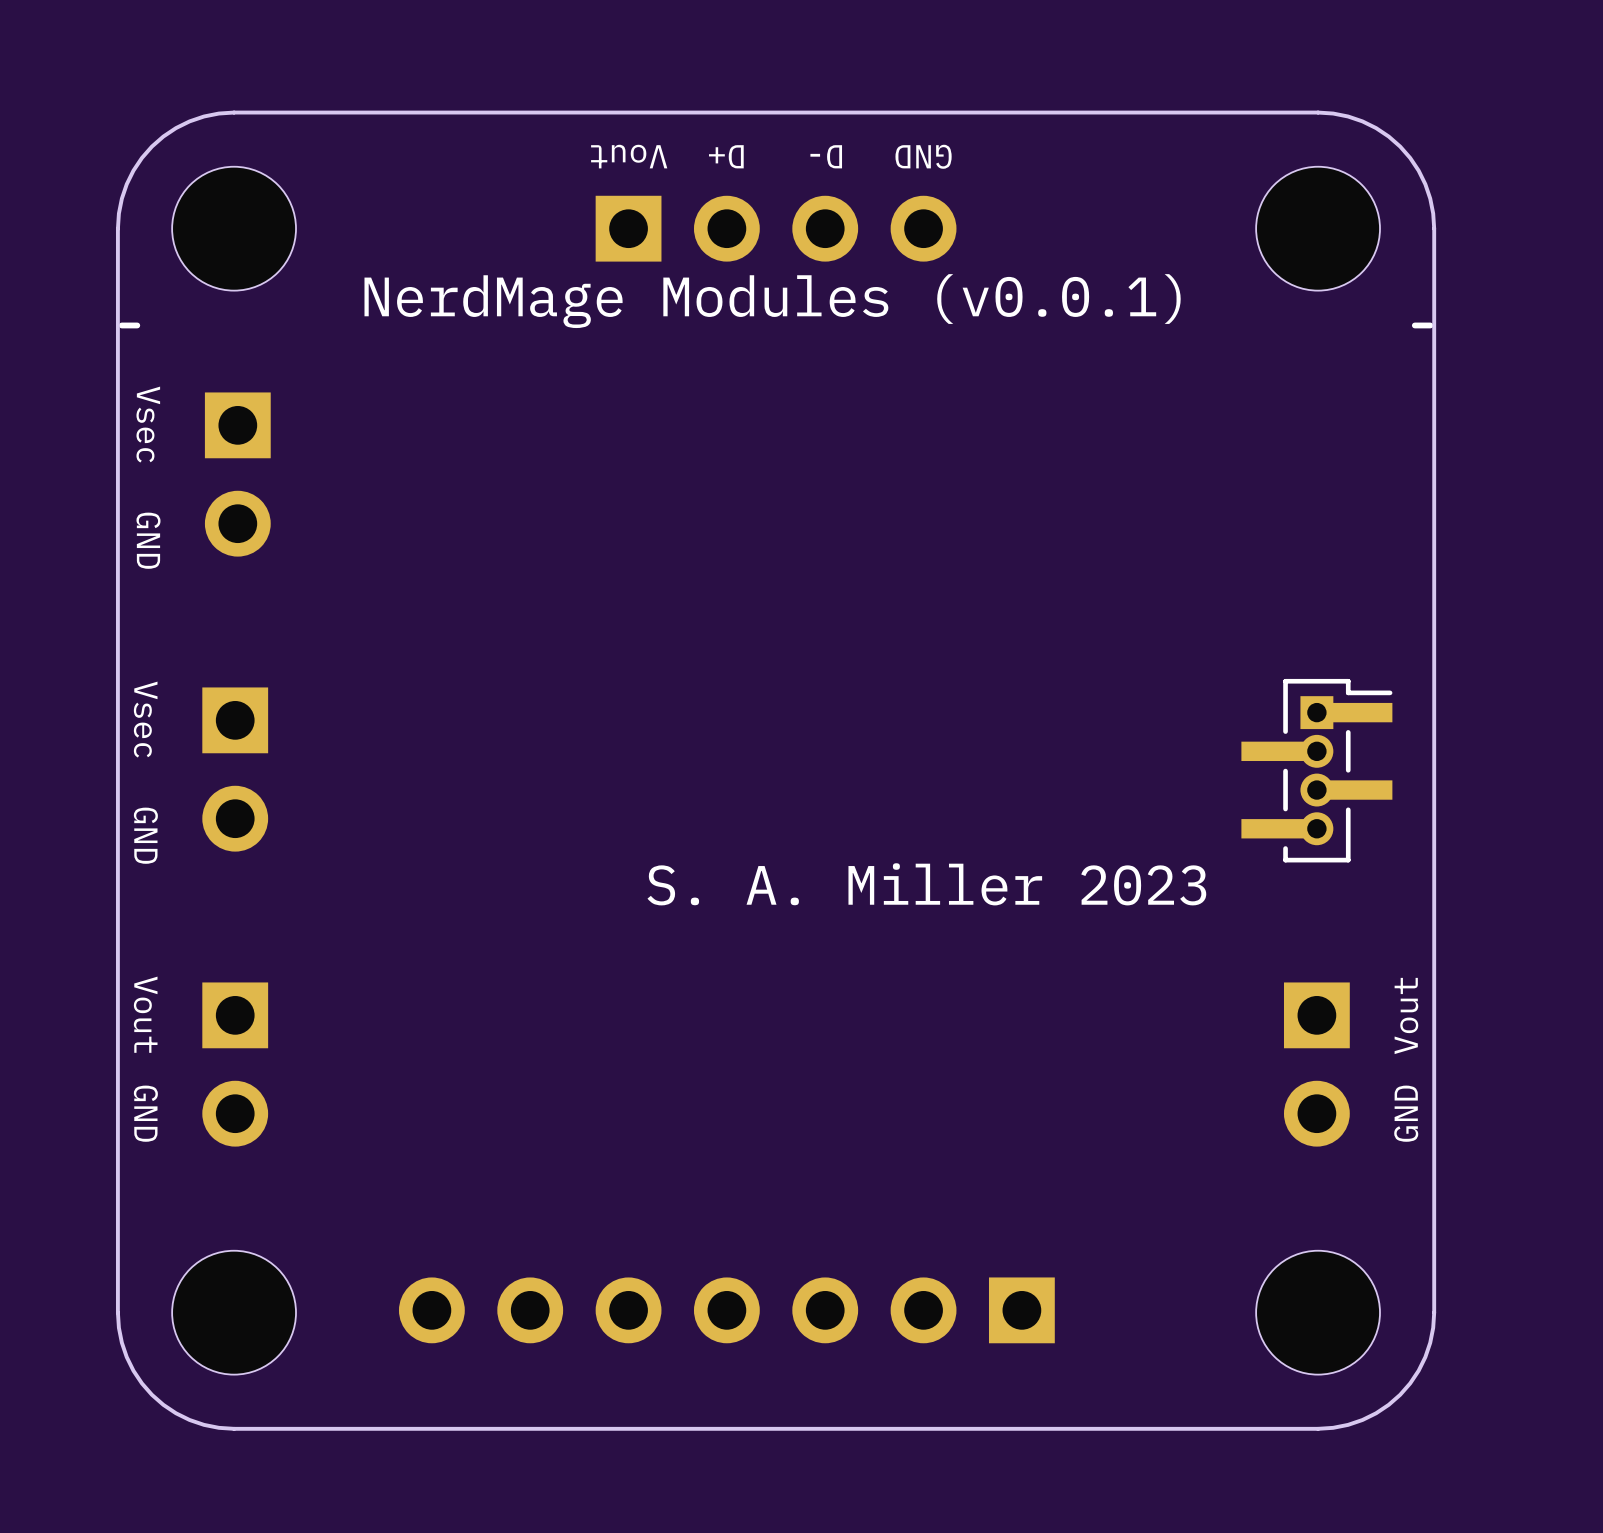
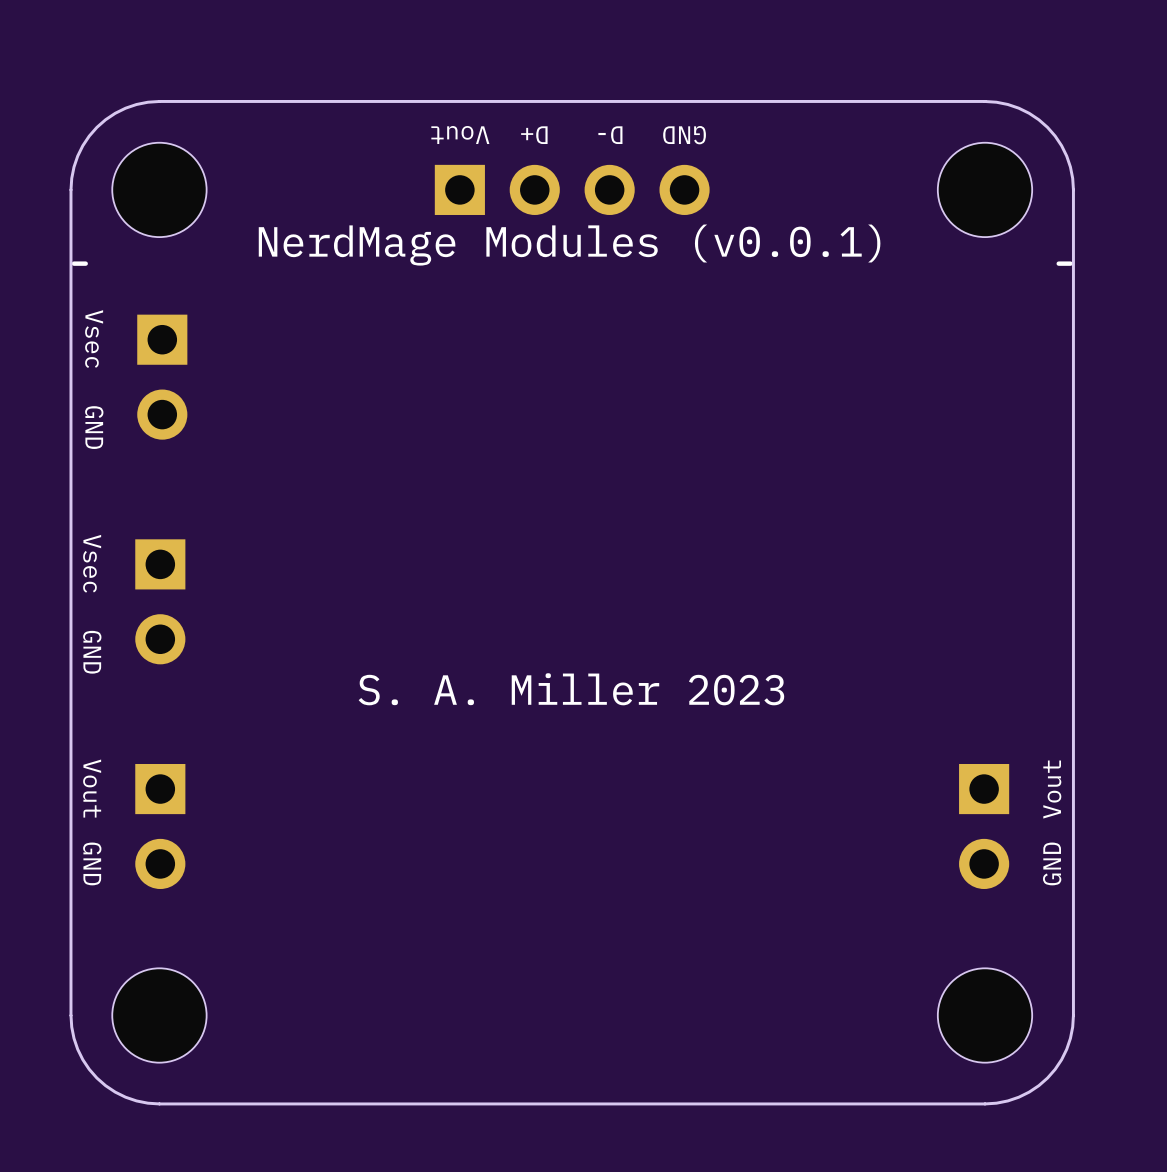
part: (1316, 770) -> none
text position: S. A. Miller 2023 (926, 884) -> S. A. Miller 2023 (571, 689)
part: (726, 1310) -> none

